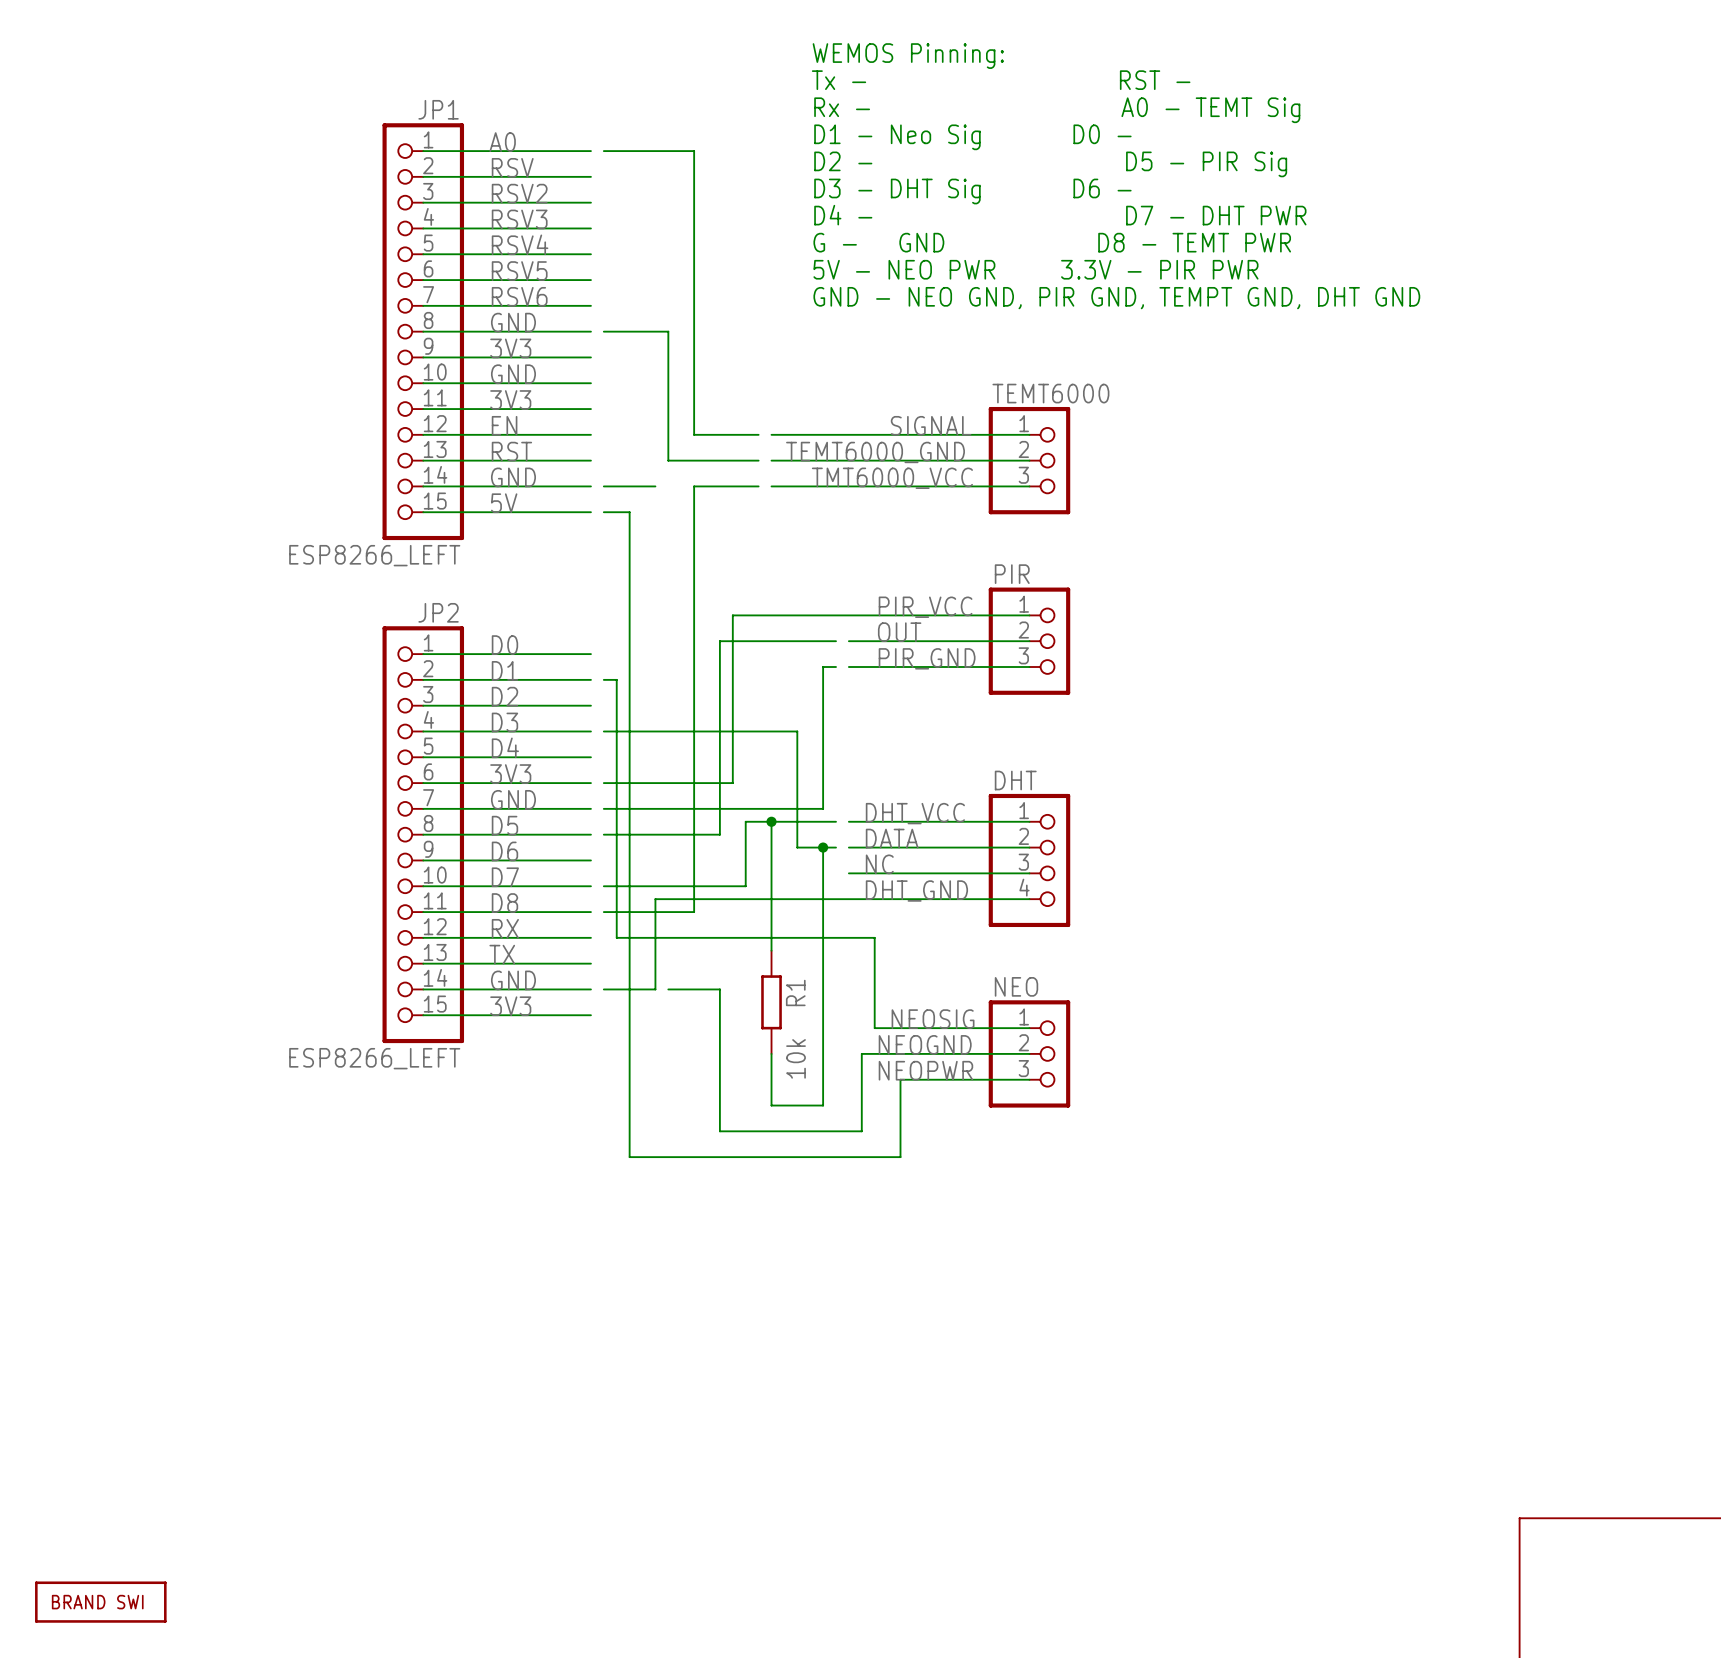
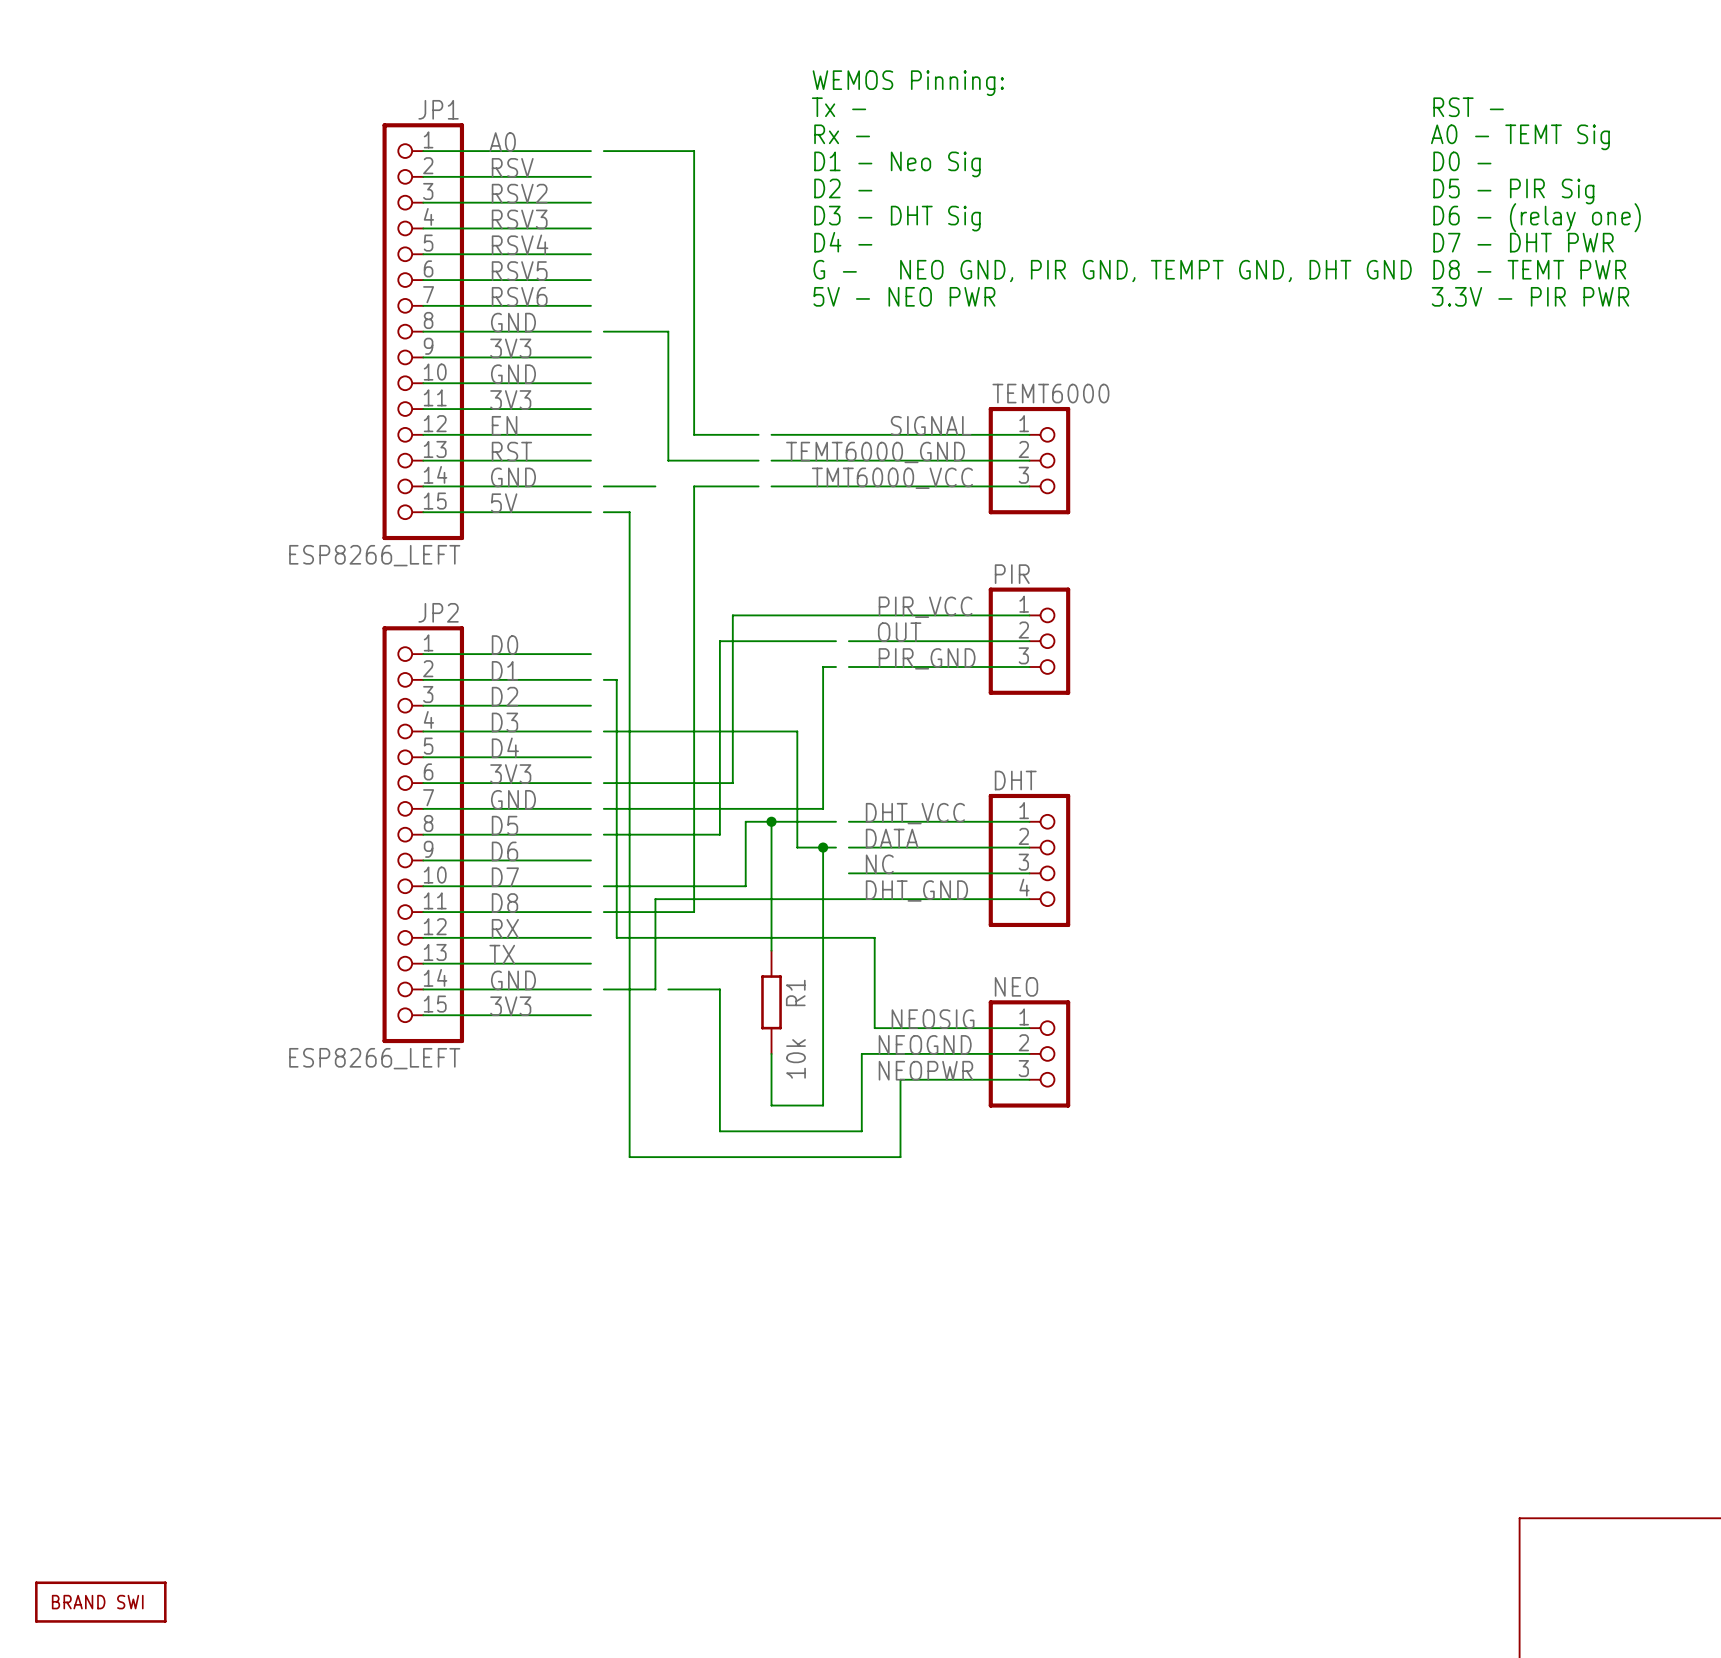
text: WEMOS Pinning: (908, 56) -> none
text: Tx - RST - (1001, 80) -> WEMOS Pinning: (908, 83)
text: none -> RST - (1468, 107)
text: Rx - A0 - TEMT Sig (1057, 110) -> Tx - (839, 107)
text: D1 - Neo Sig D0 - (972, 137) -> Rx - (842, 134)
text: none -> A0 - TEMT Sig (1520, 137)
text: none -> D0 - (1462, 161)
text: D2 - D5 - PIR Sig (1050, 164) -> D1 - Neo Sig (897, 164)
text: D3 - DHT Sig D6 - (972, 191) -> D2 - (843, 188)
text: none -> D5 - PIR Sig (1513, 191)
text: D4 - D7 - DHT PWR (1060, 215) -> D3 - DHT Sig (897, 218)
text: none -> D6 - (relay one) (1537, 217)
text: G - GND D8 - TEMT PWR (1052, 242) -> D4 - (843, 242)
text: none -> D7 - DHT PWR (1523, 242)
text: 5V - NEO PWR 3.3V - PIR PWR (1035, 269) -> G - NEO GND, PIR GND, TEMPT GND, DHT GND (1112, 271)
text: none -> D8 - TEMT PWR (1529, 269)
text: none -> 3.3V - PIR PWR (1530, 296)
text: GND - NEO GND, PIR GND, TEMPT GND, DHT GND (1116, 298) -> 5V - NEO PWR (904, 296)

